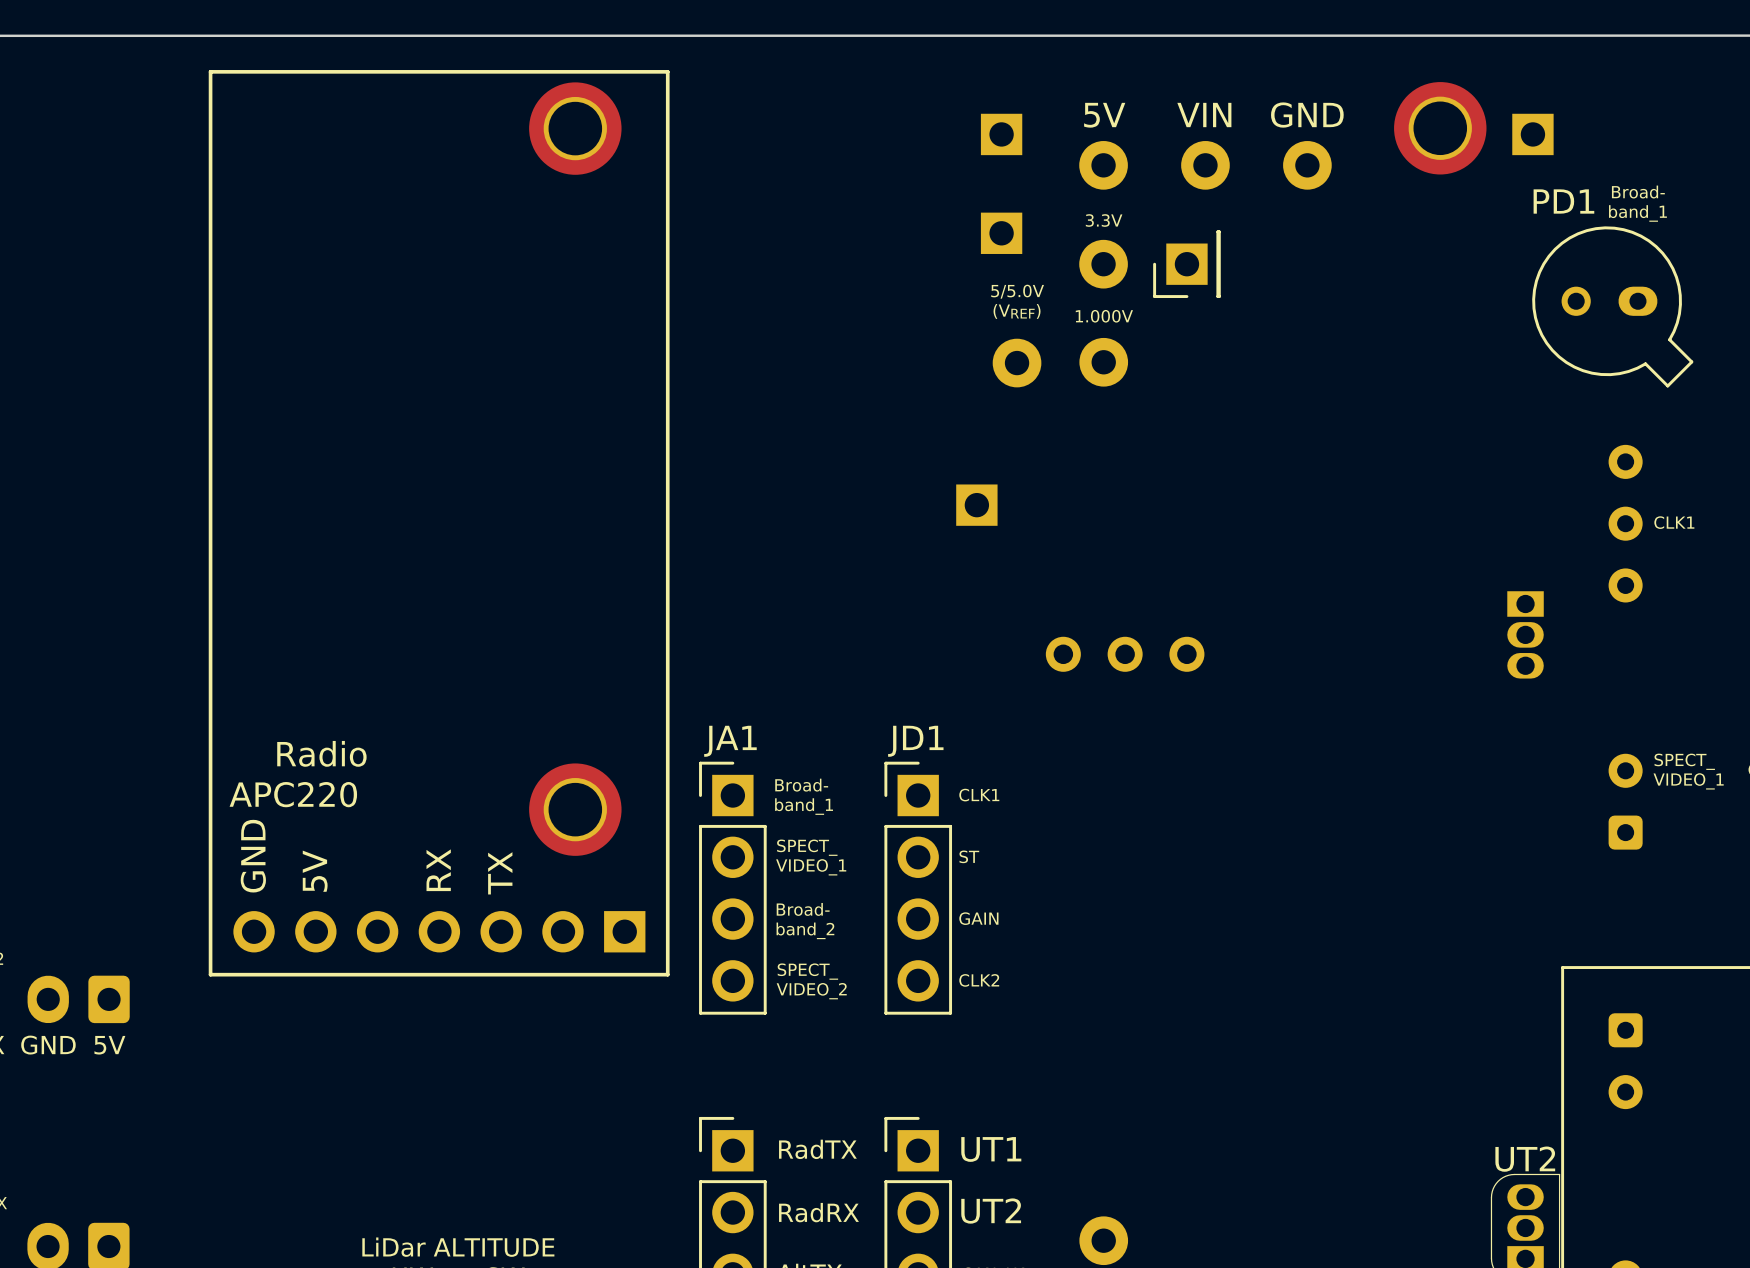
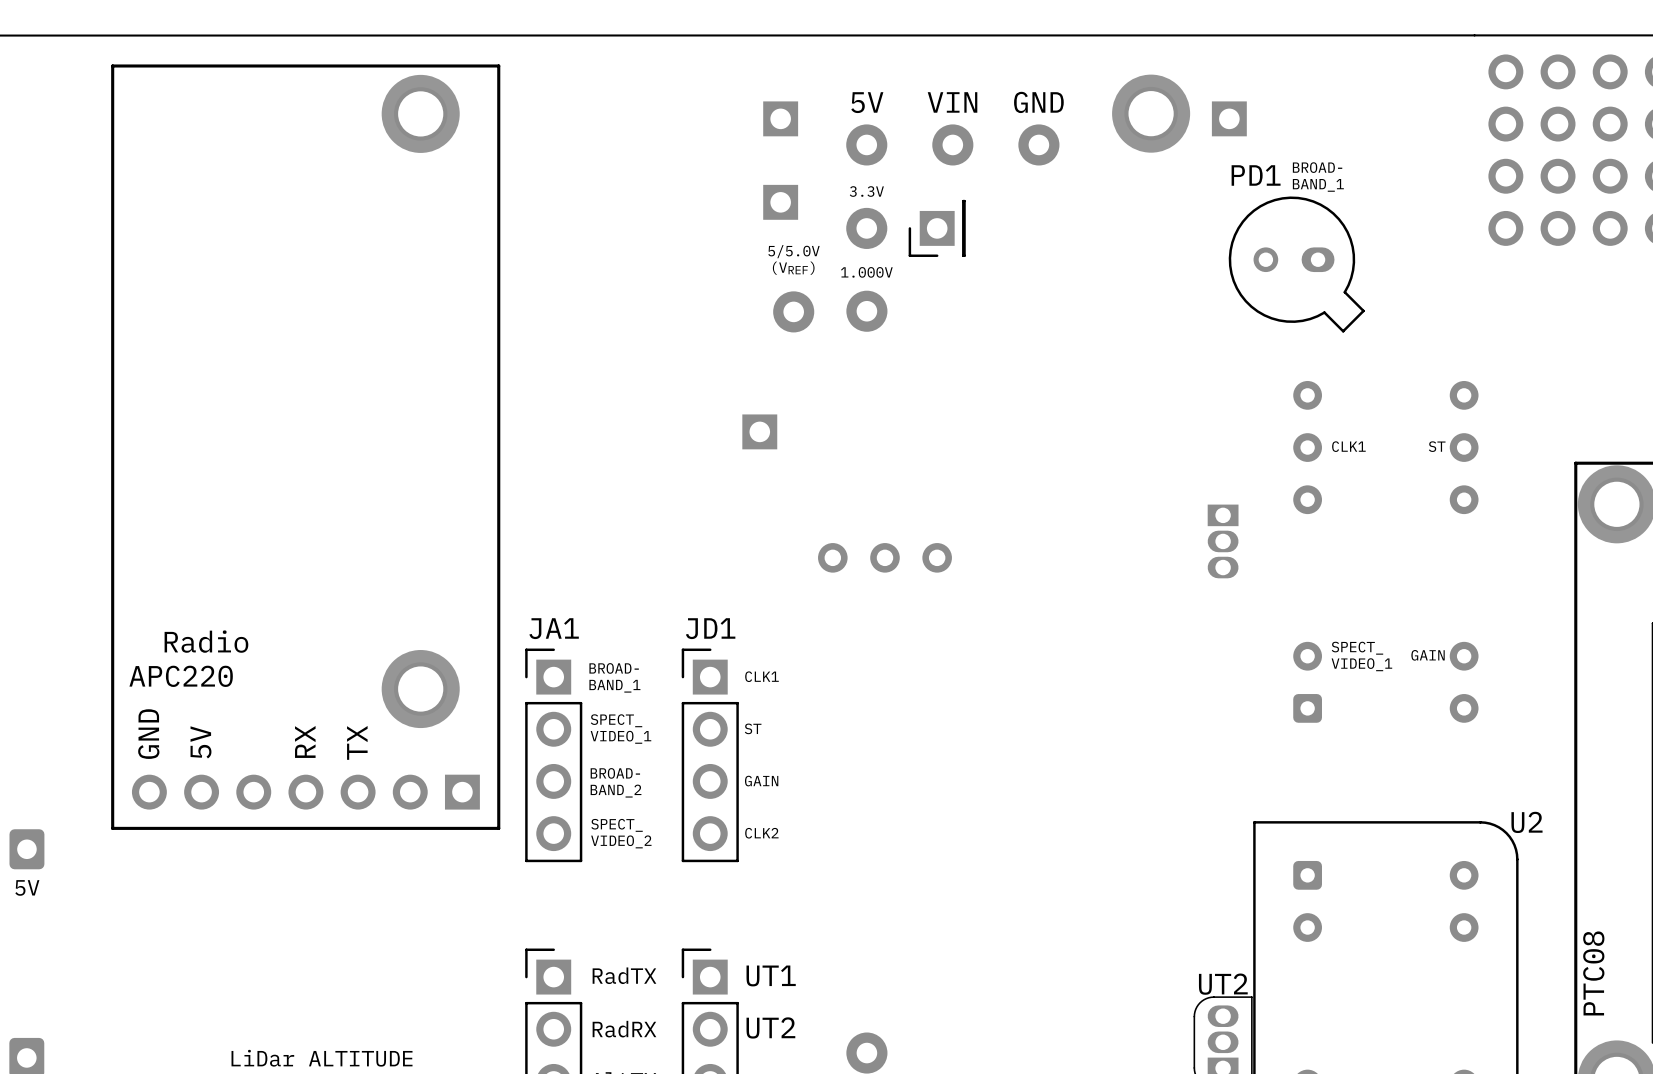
text: Broad- (1638, 192) -> BROAD- (1317, 167)
text: band_1 (1637, 213) -> BAND_1 (1318, 185)
text: Broad- (801, 785) -> BROAD- (614, 668)
text: band_1 (804, 806) -> BAND_1 (614, 686)
text: Broad- (803, 909) -> BROAD- (615, 773)
text: band_2 (805, 930) -> BAND_2 (616, 791)

